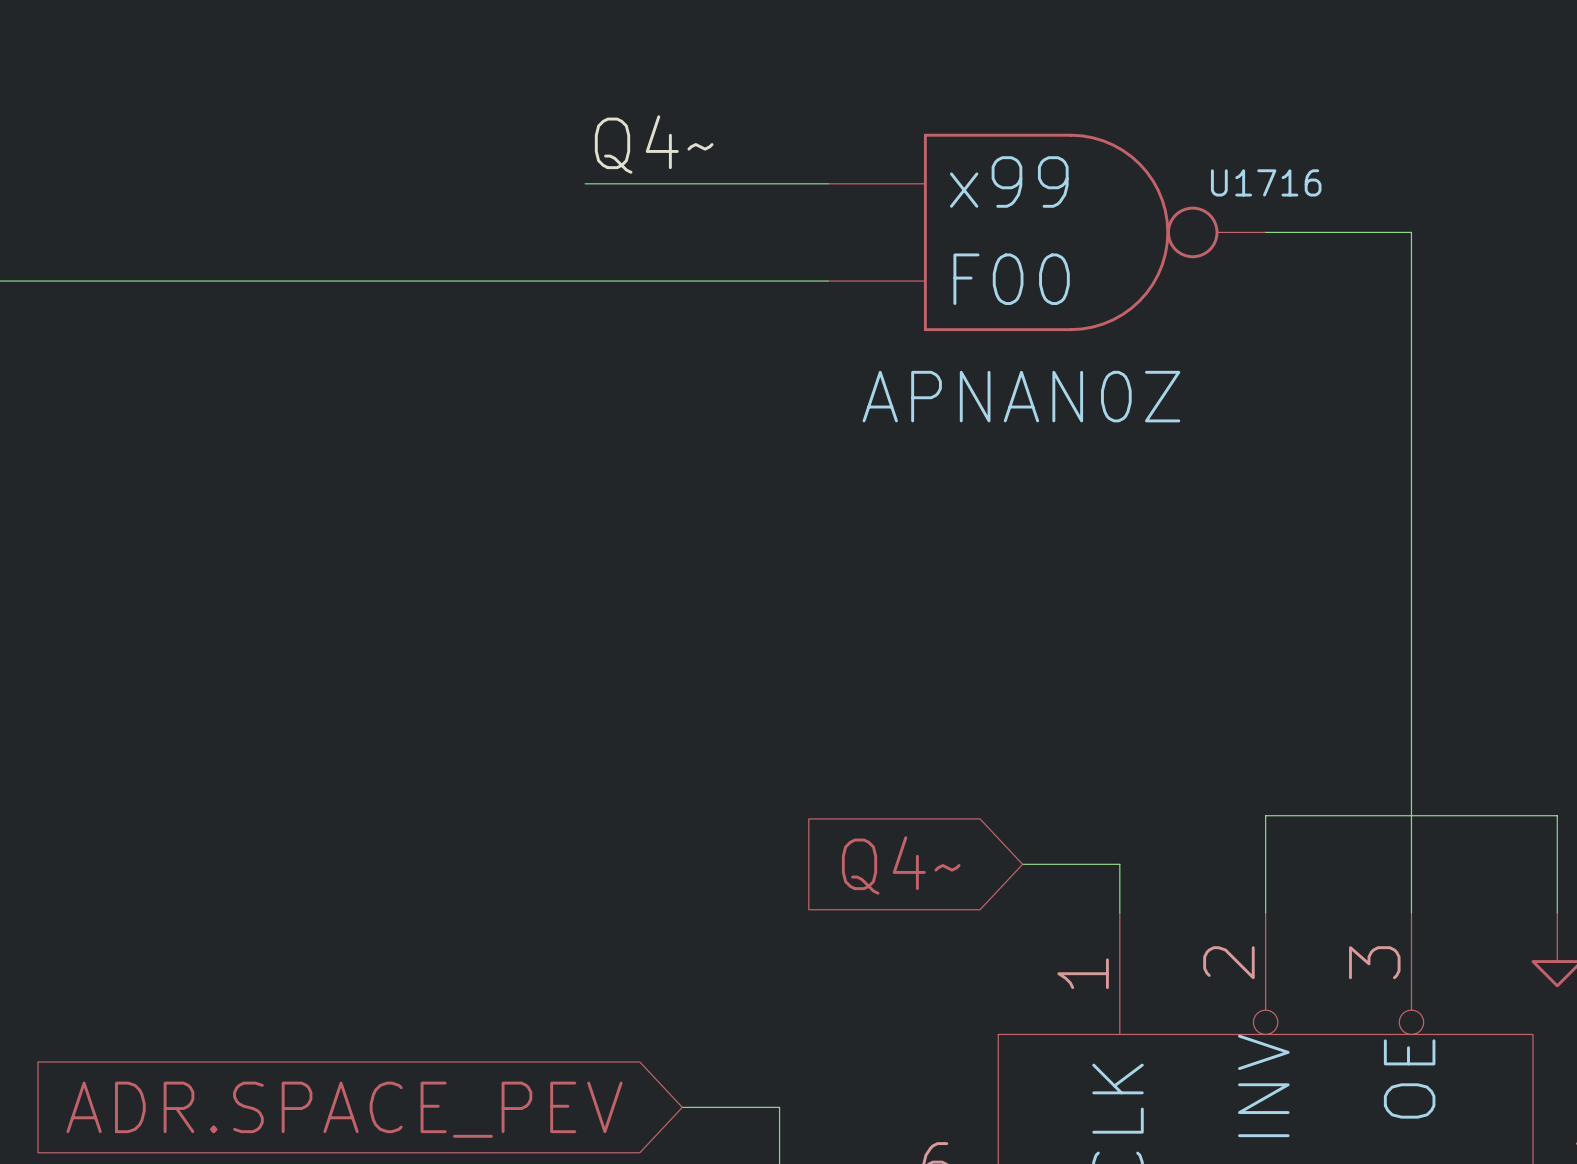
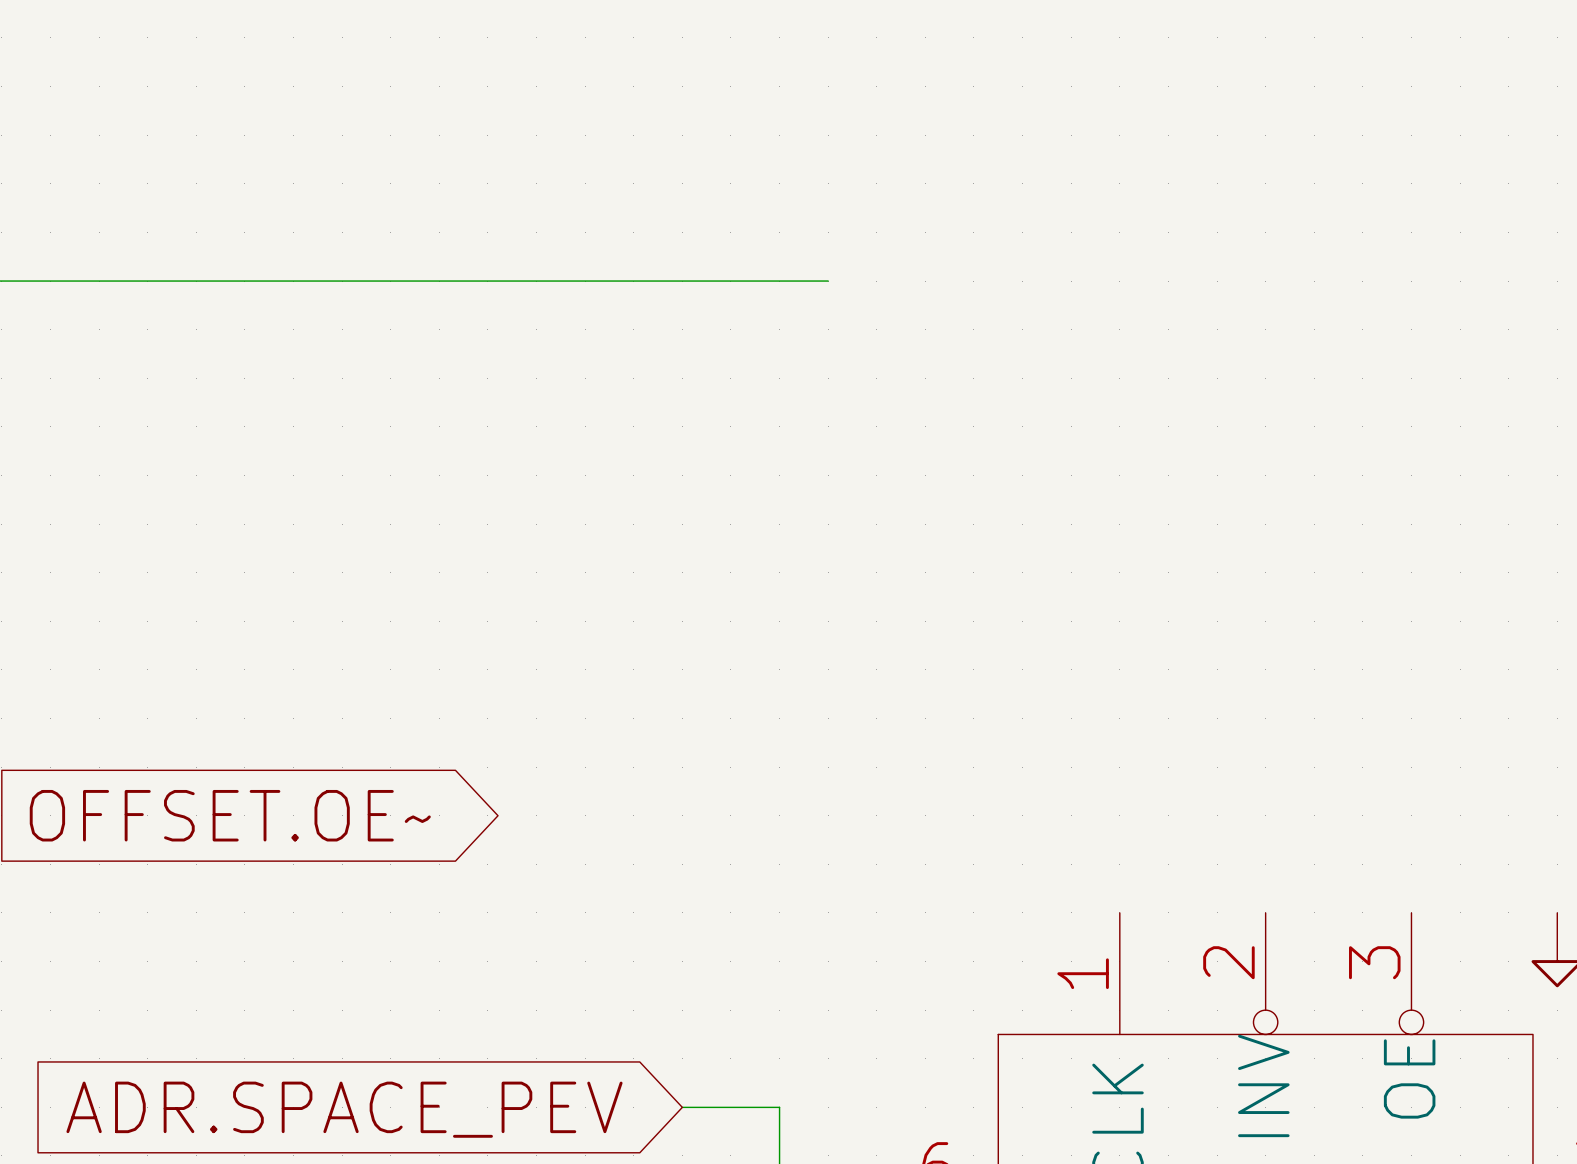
label: Q4~ (654, 144) -> none
wire: (585, 183) (828, 183) -> none
U1716: F00 (1046, 232) -> none
wire: (1265, 232) (1411, 232) (1411, 912) -> none
global label: none -> OFFSET.OE~ (230, 815)
wire: (1022, 864) (1119, 864) (1119, 912) -> none
global label: Q4~ (901, 865) -> none
wire: (1265, 912) (1265, 815) (1557, 815) (1557, 912) -> none

